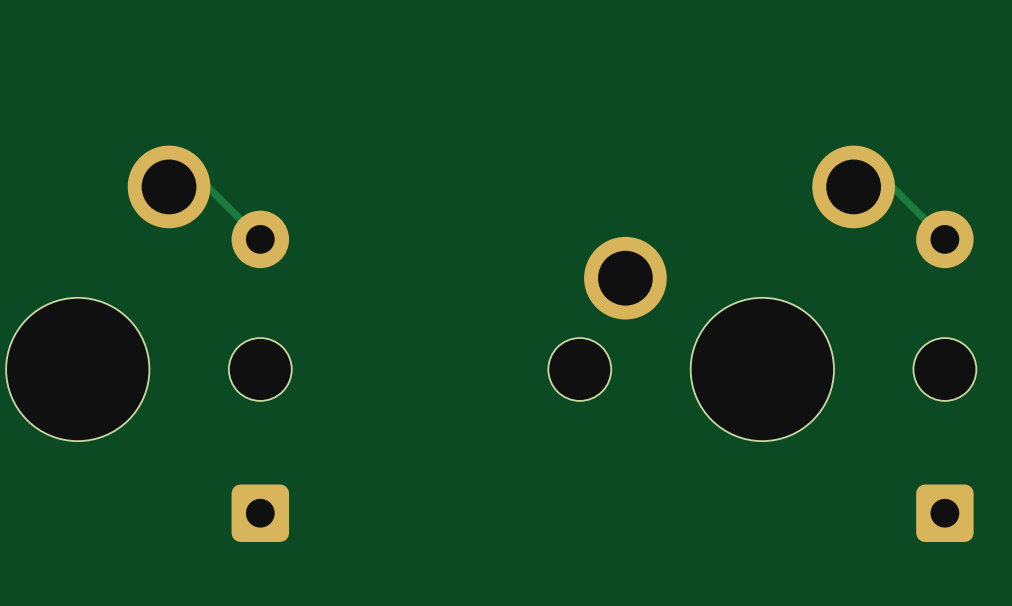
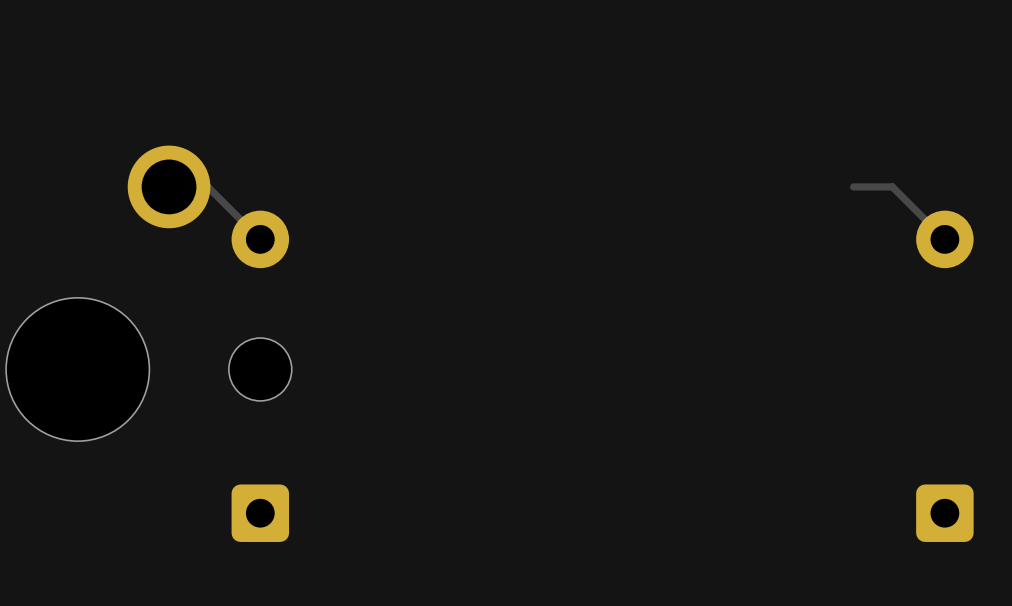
part: (762, 293) -> none

